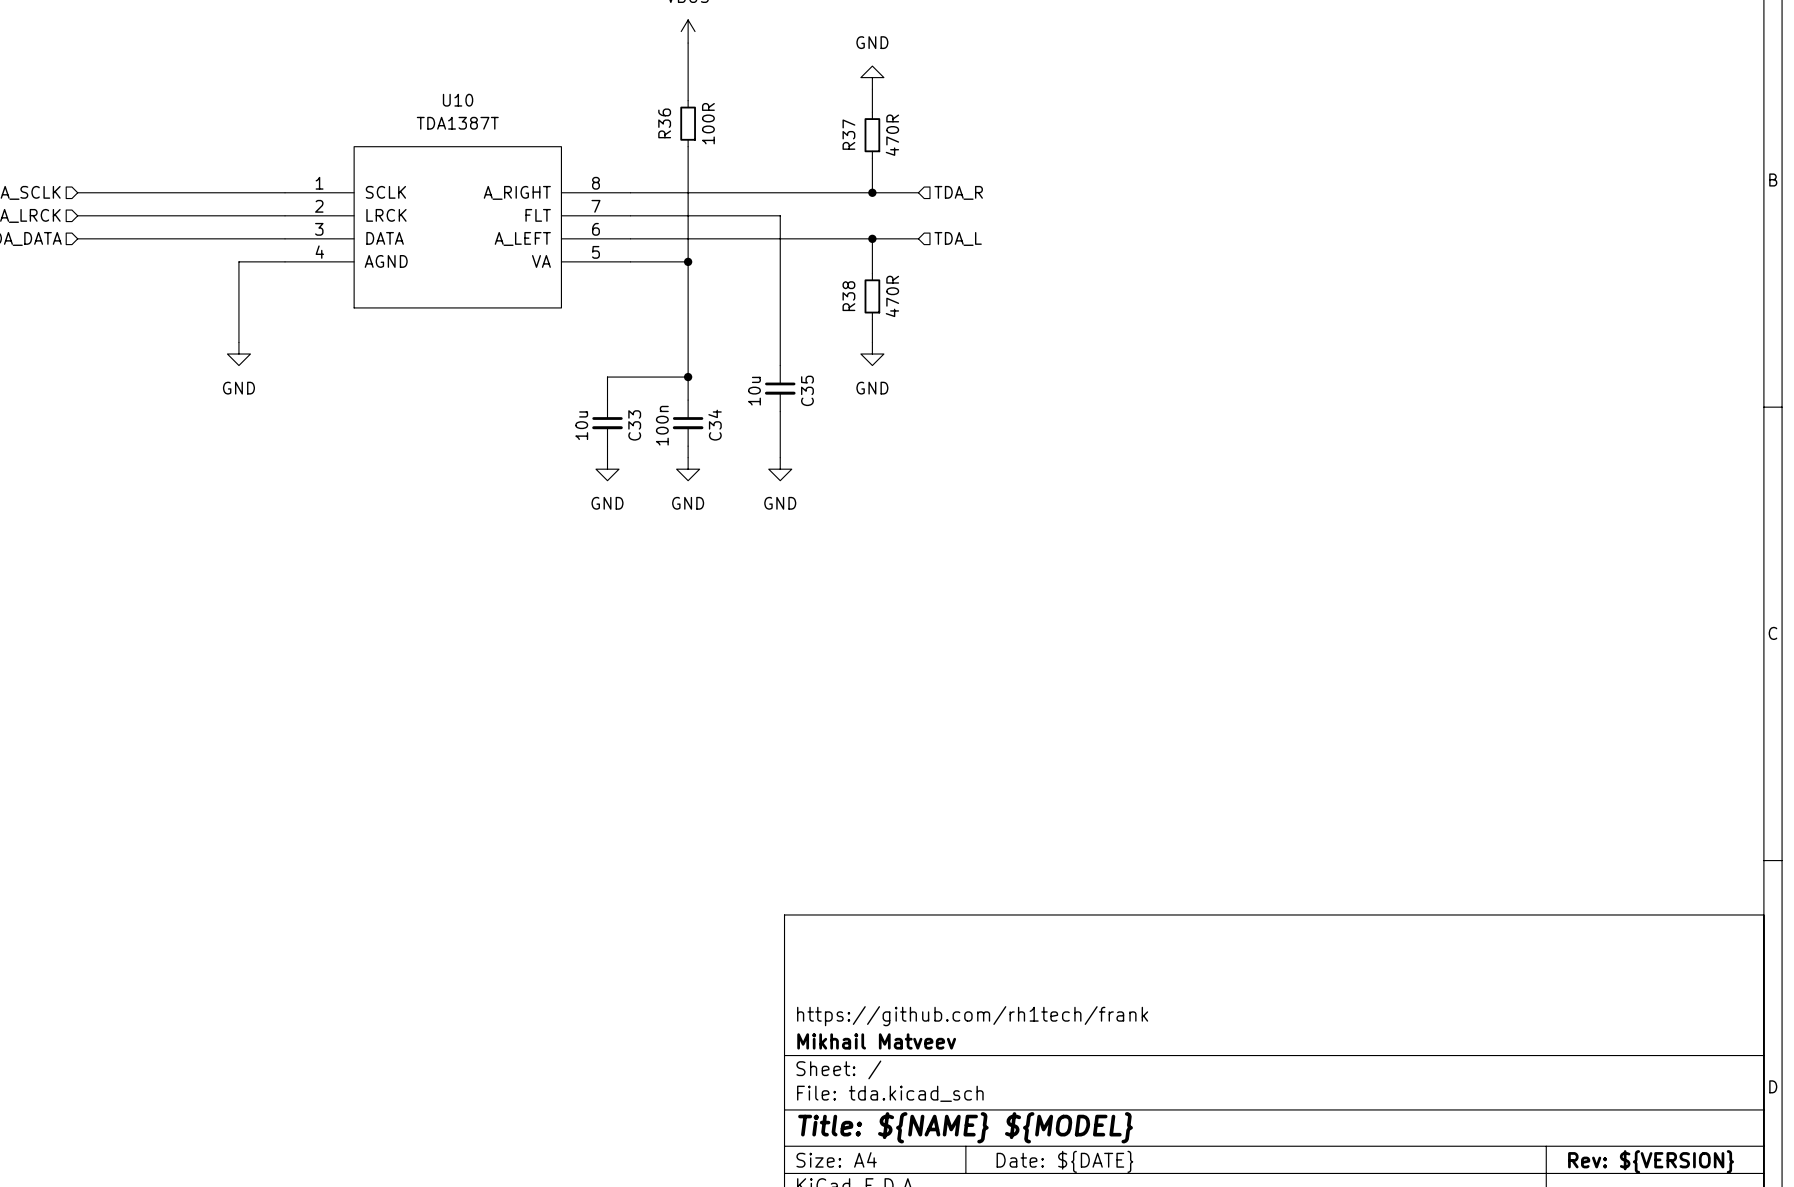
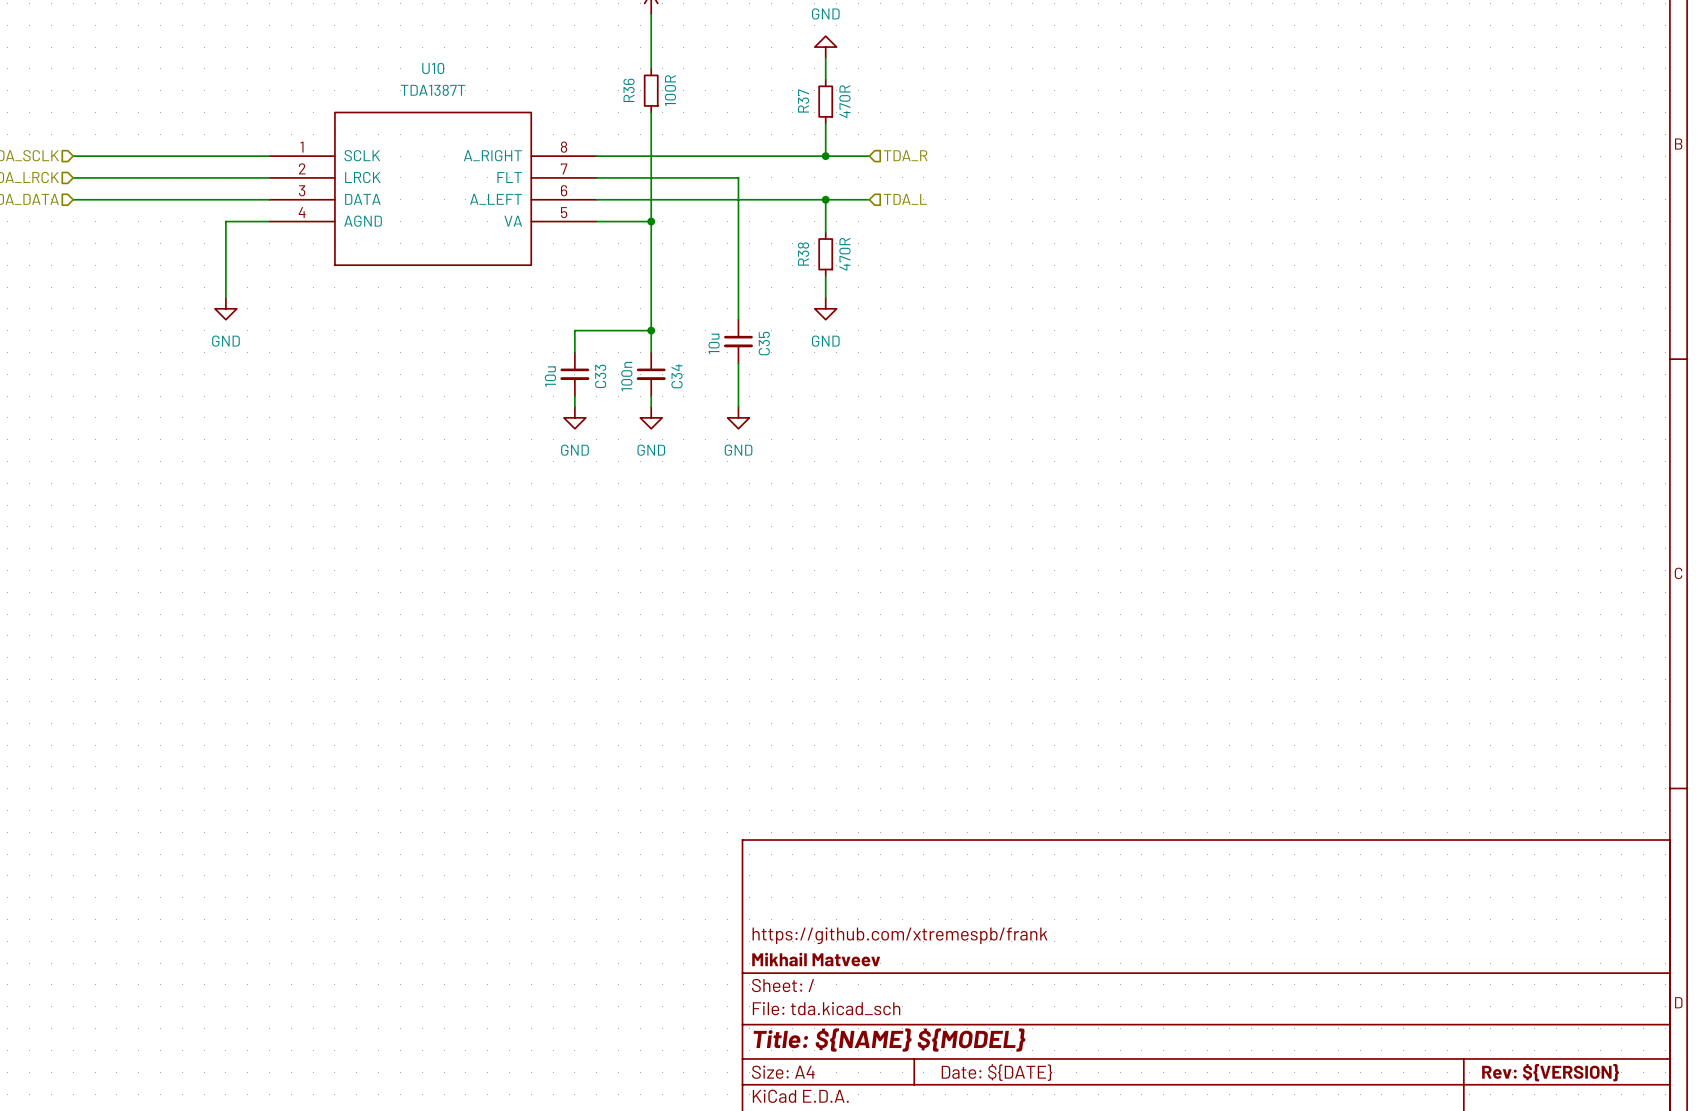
title block: https://github.com/rh1tech/frank (972, 1016) -> https://github.com/xtremespb/frank (899, 935)

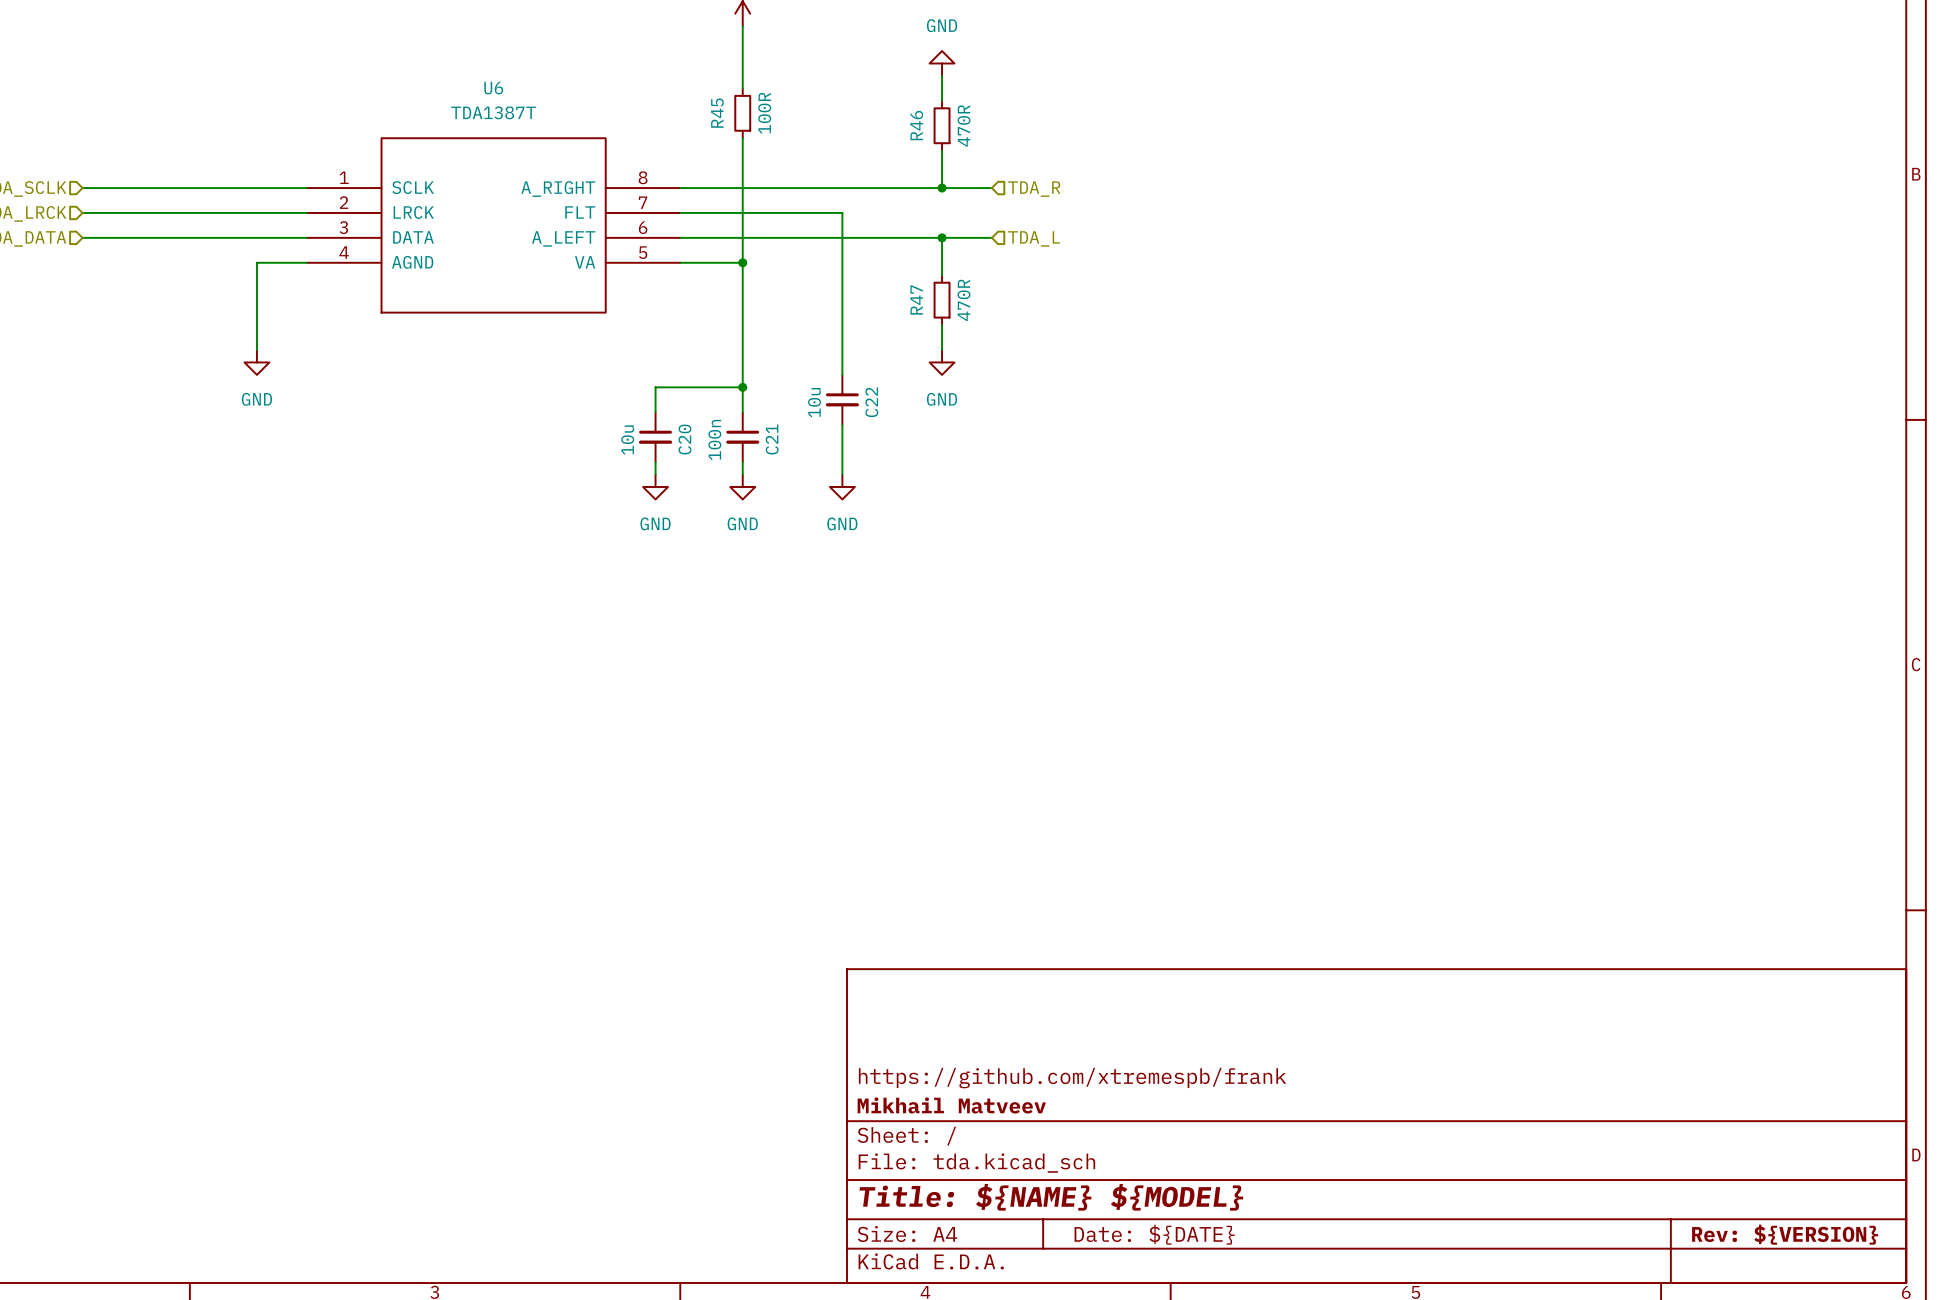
U10 name: U10 (433, 68) -> U6 (493, 88)
R36 name: R36 (629, 90) -> R45 (717, 113)
R37 name: R37 (803, 101) -> R46 (916, 125)
R38 name: R38 (803, 254) -> R47 (916, 299)
C35 name: C35 (764, 343) -> C22 (871, 402)
C33 name: C33 (600, 376) -> C20 (684, 439)
C34 name: C34 (676, 376) -> C21 (772, 439)

